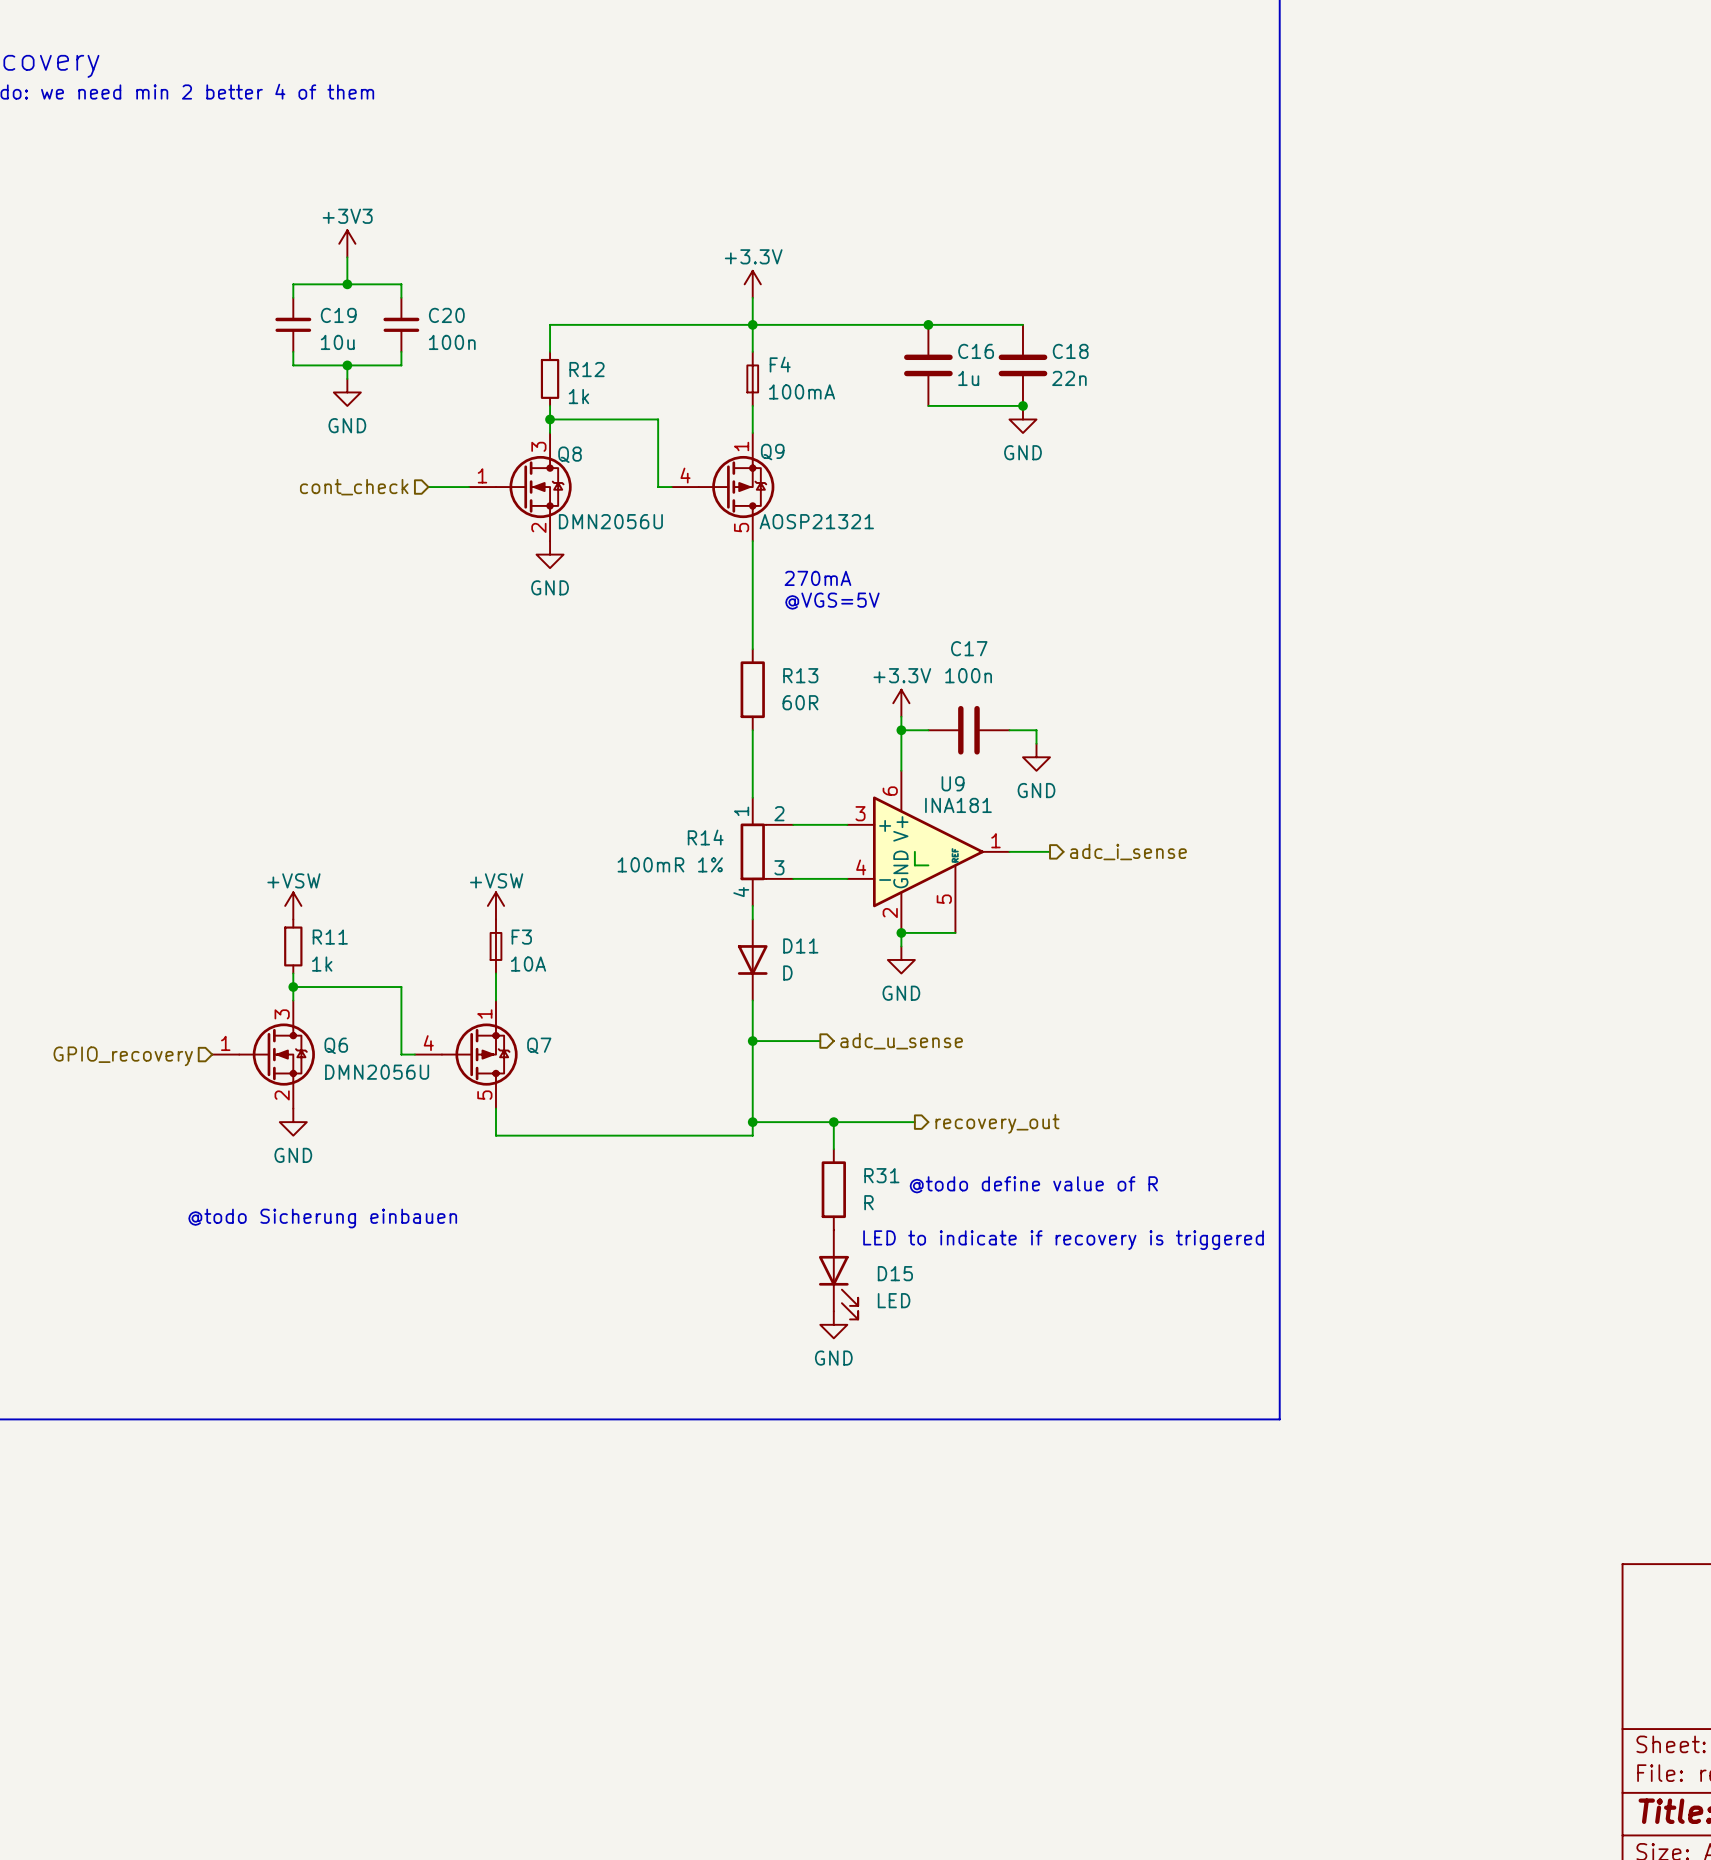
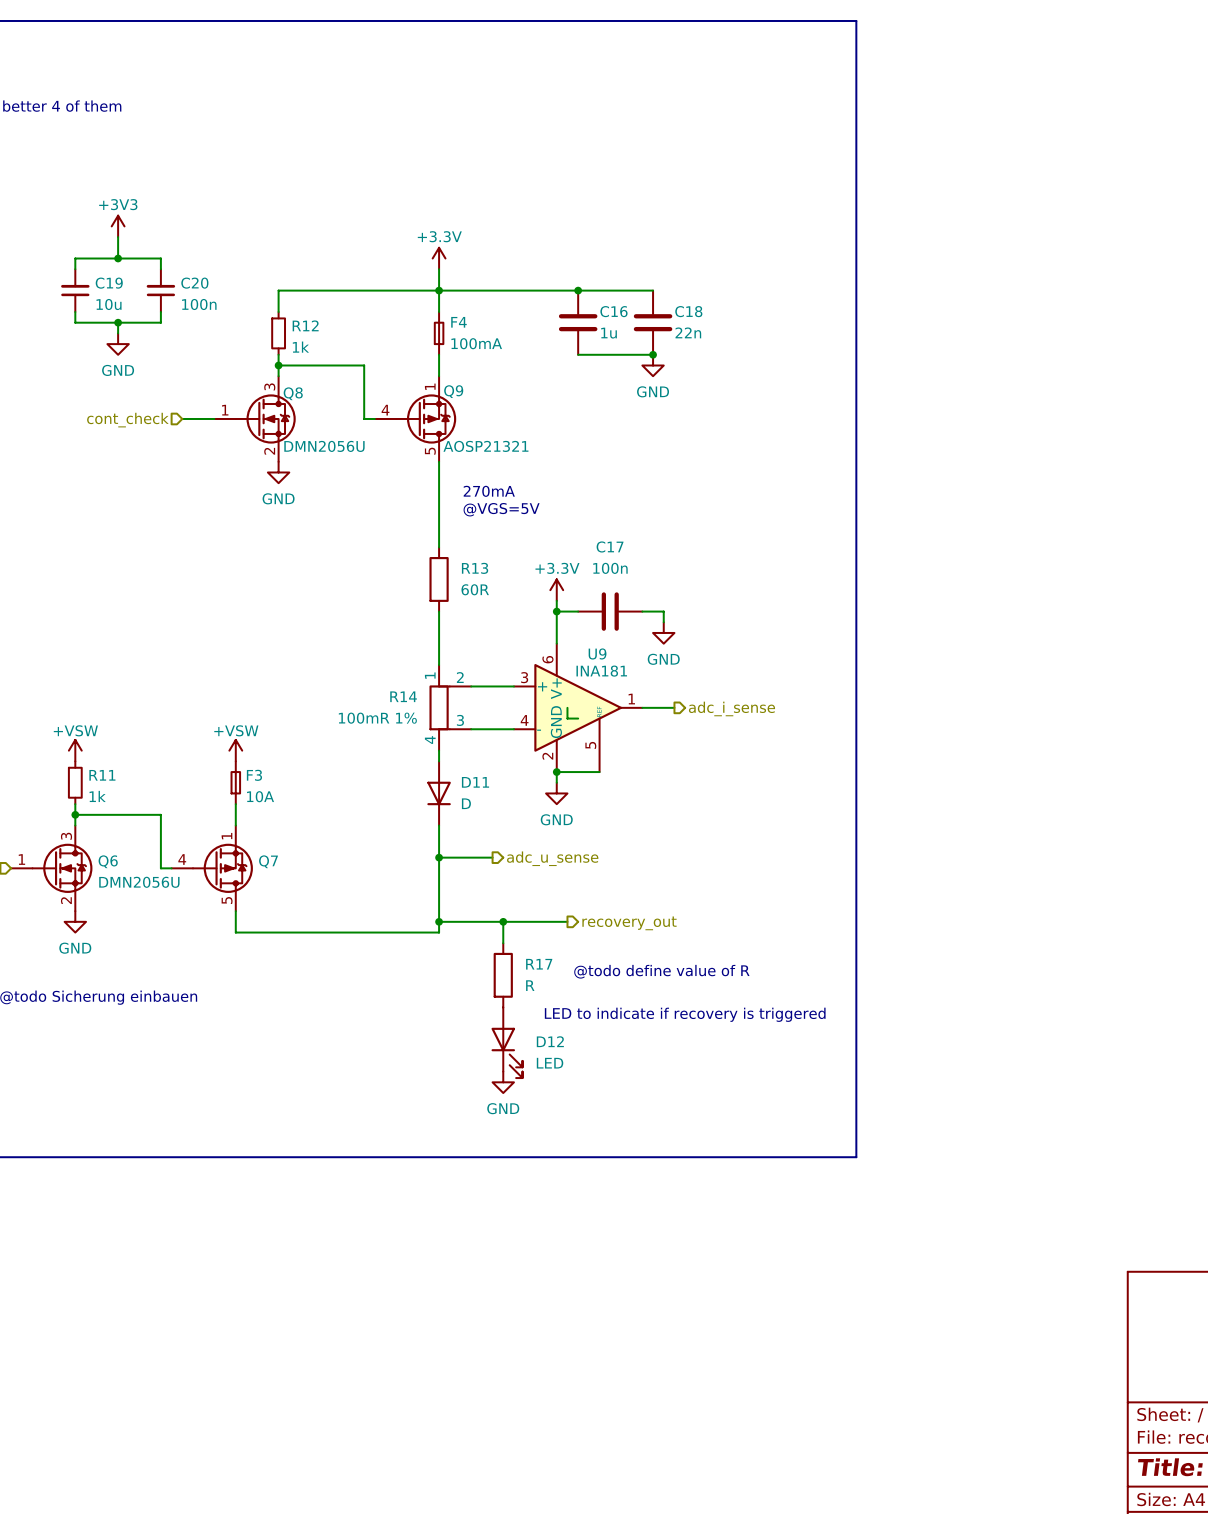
R31 name: R31 (881, 1175) -> R17 (539, 964)
D15 name: D15 (895, 1273) -> D12 (550, 1041)

